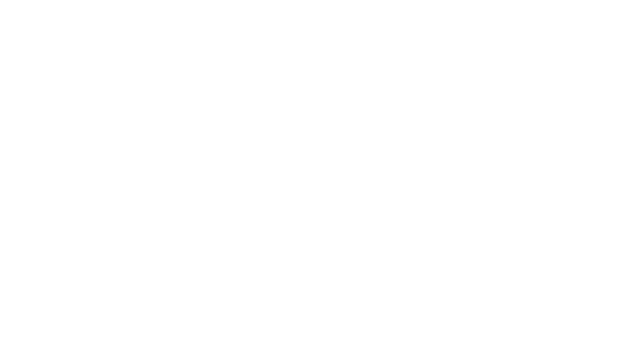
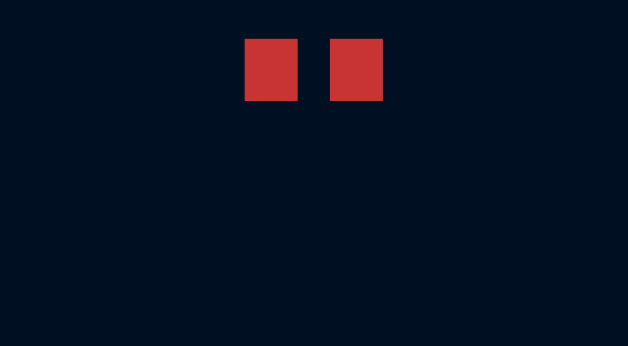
part: none -> (313, 69)

